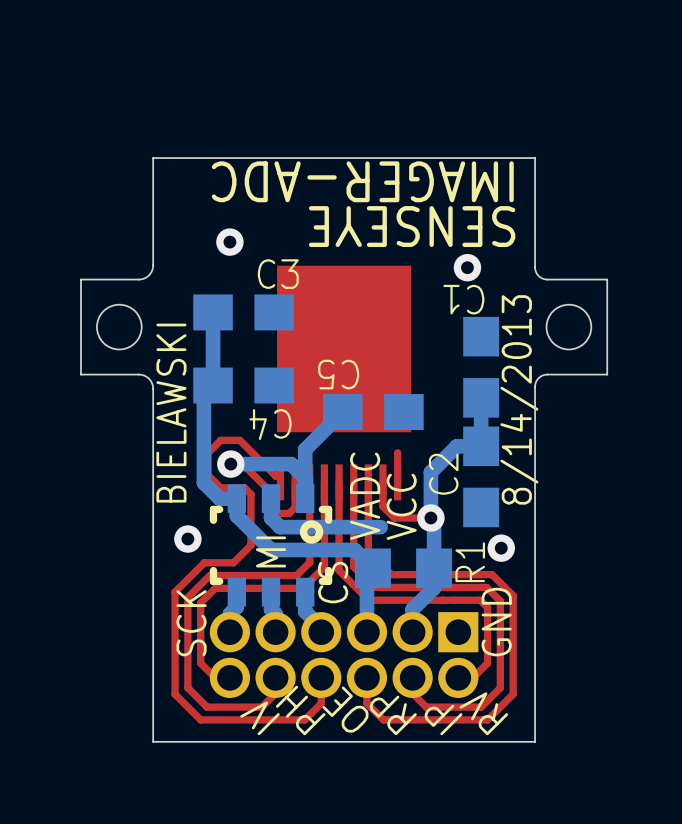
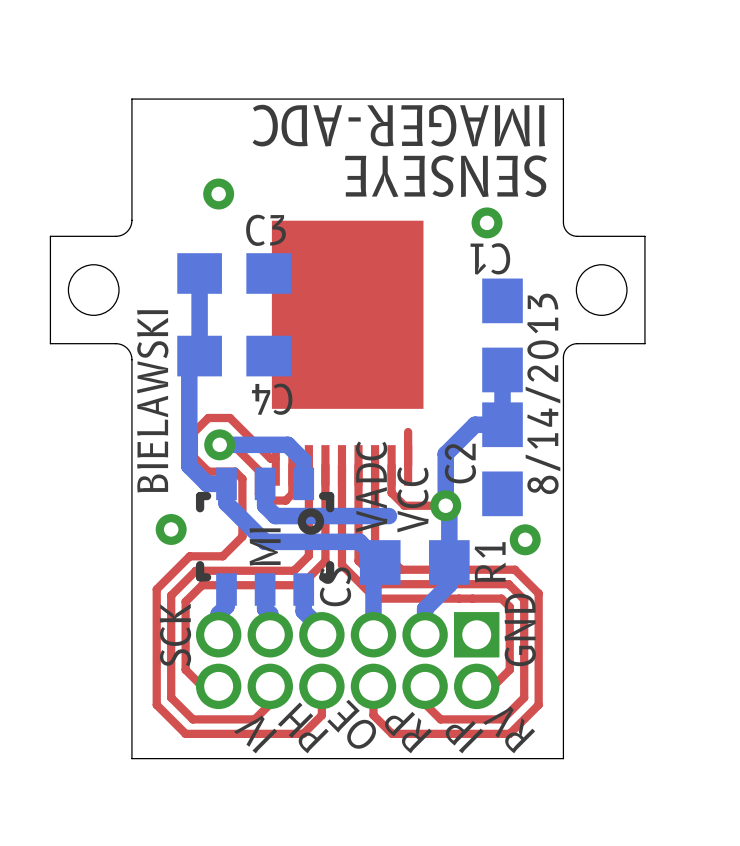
bottom track: (342, 412) (305, 449) (305, 478) -> none
C5: (373, 412) -> none

